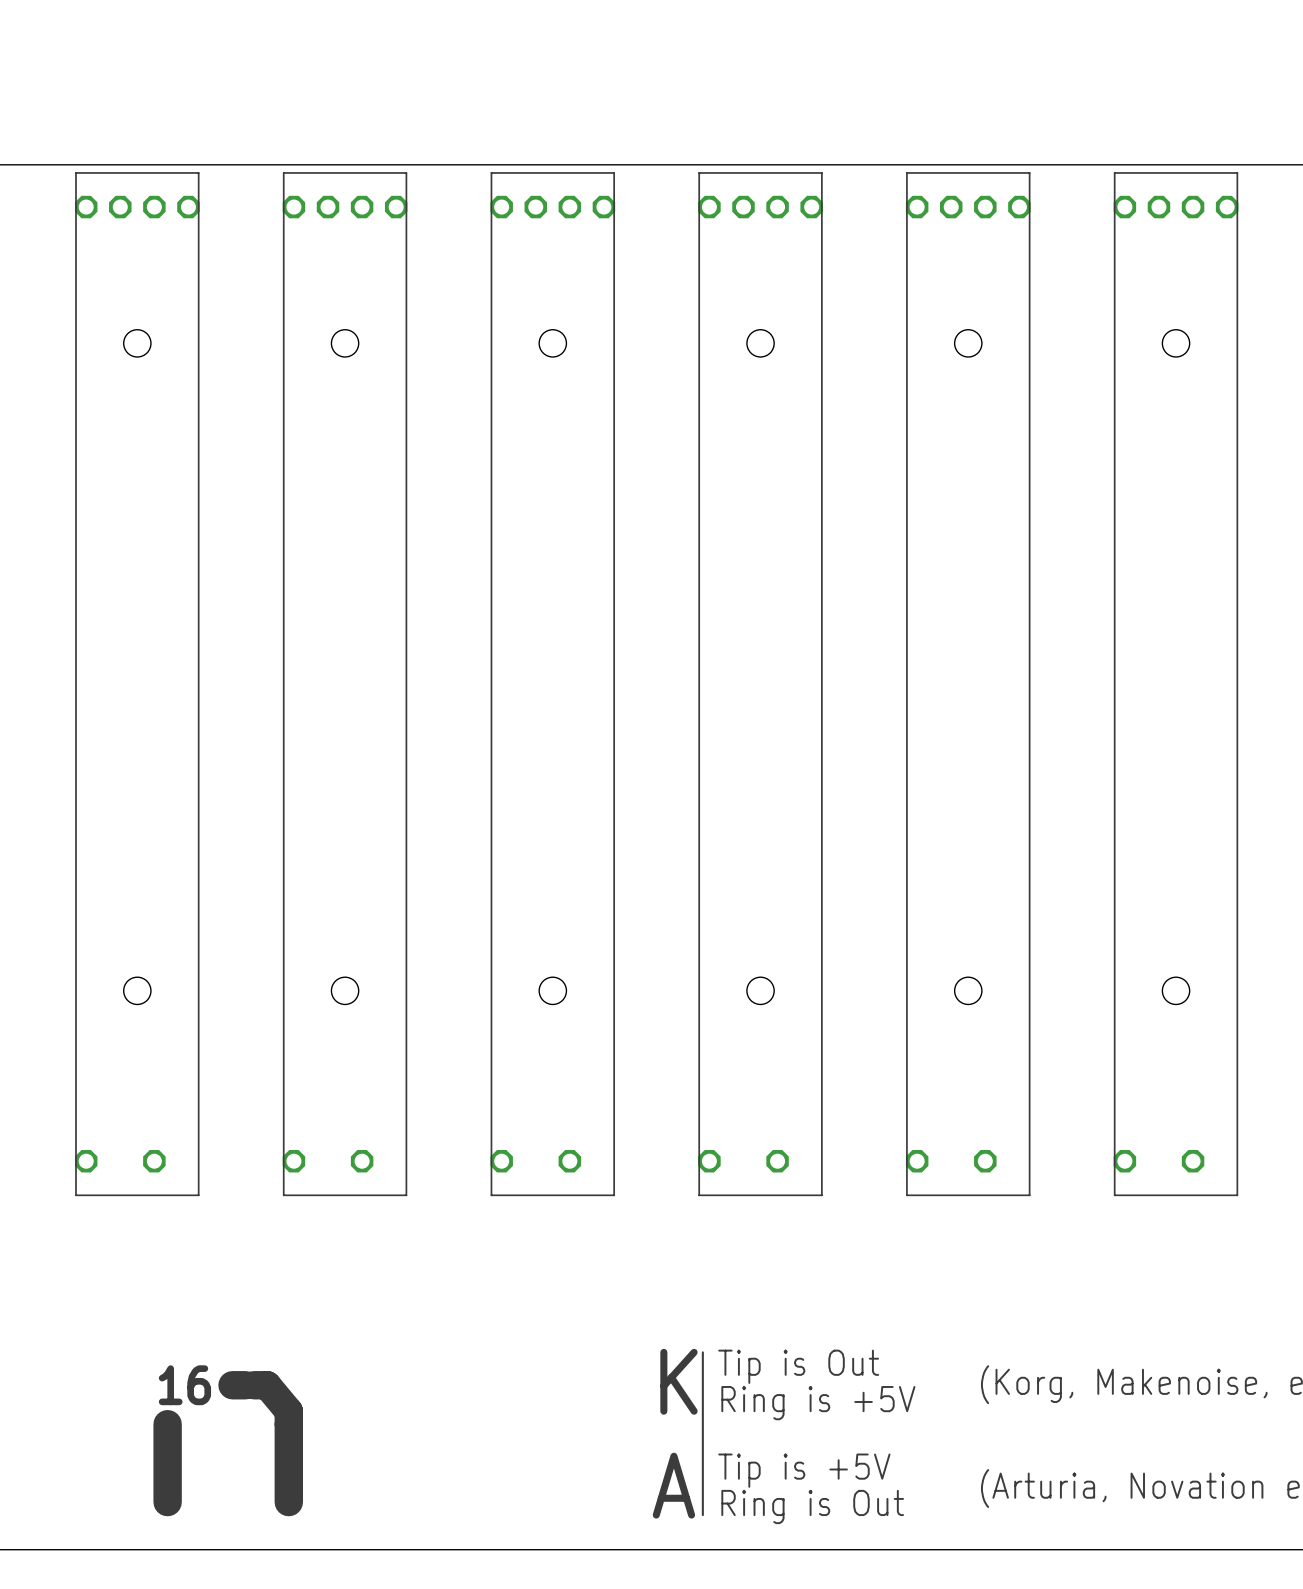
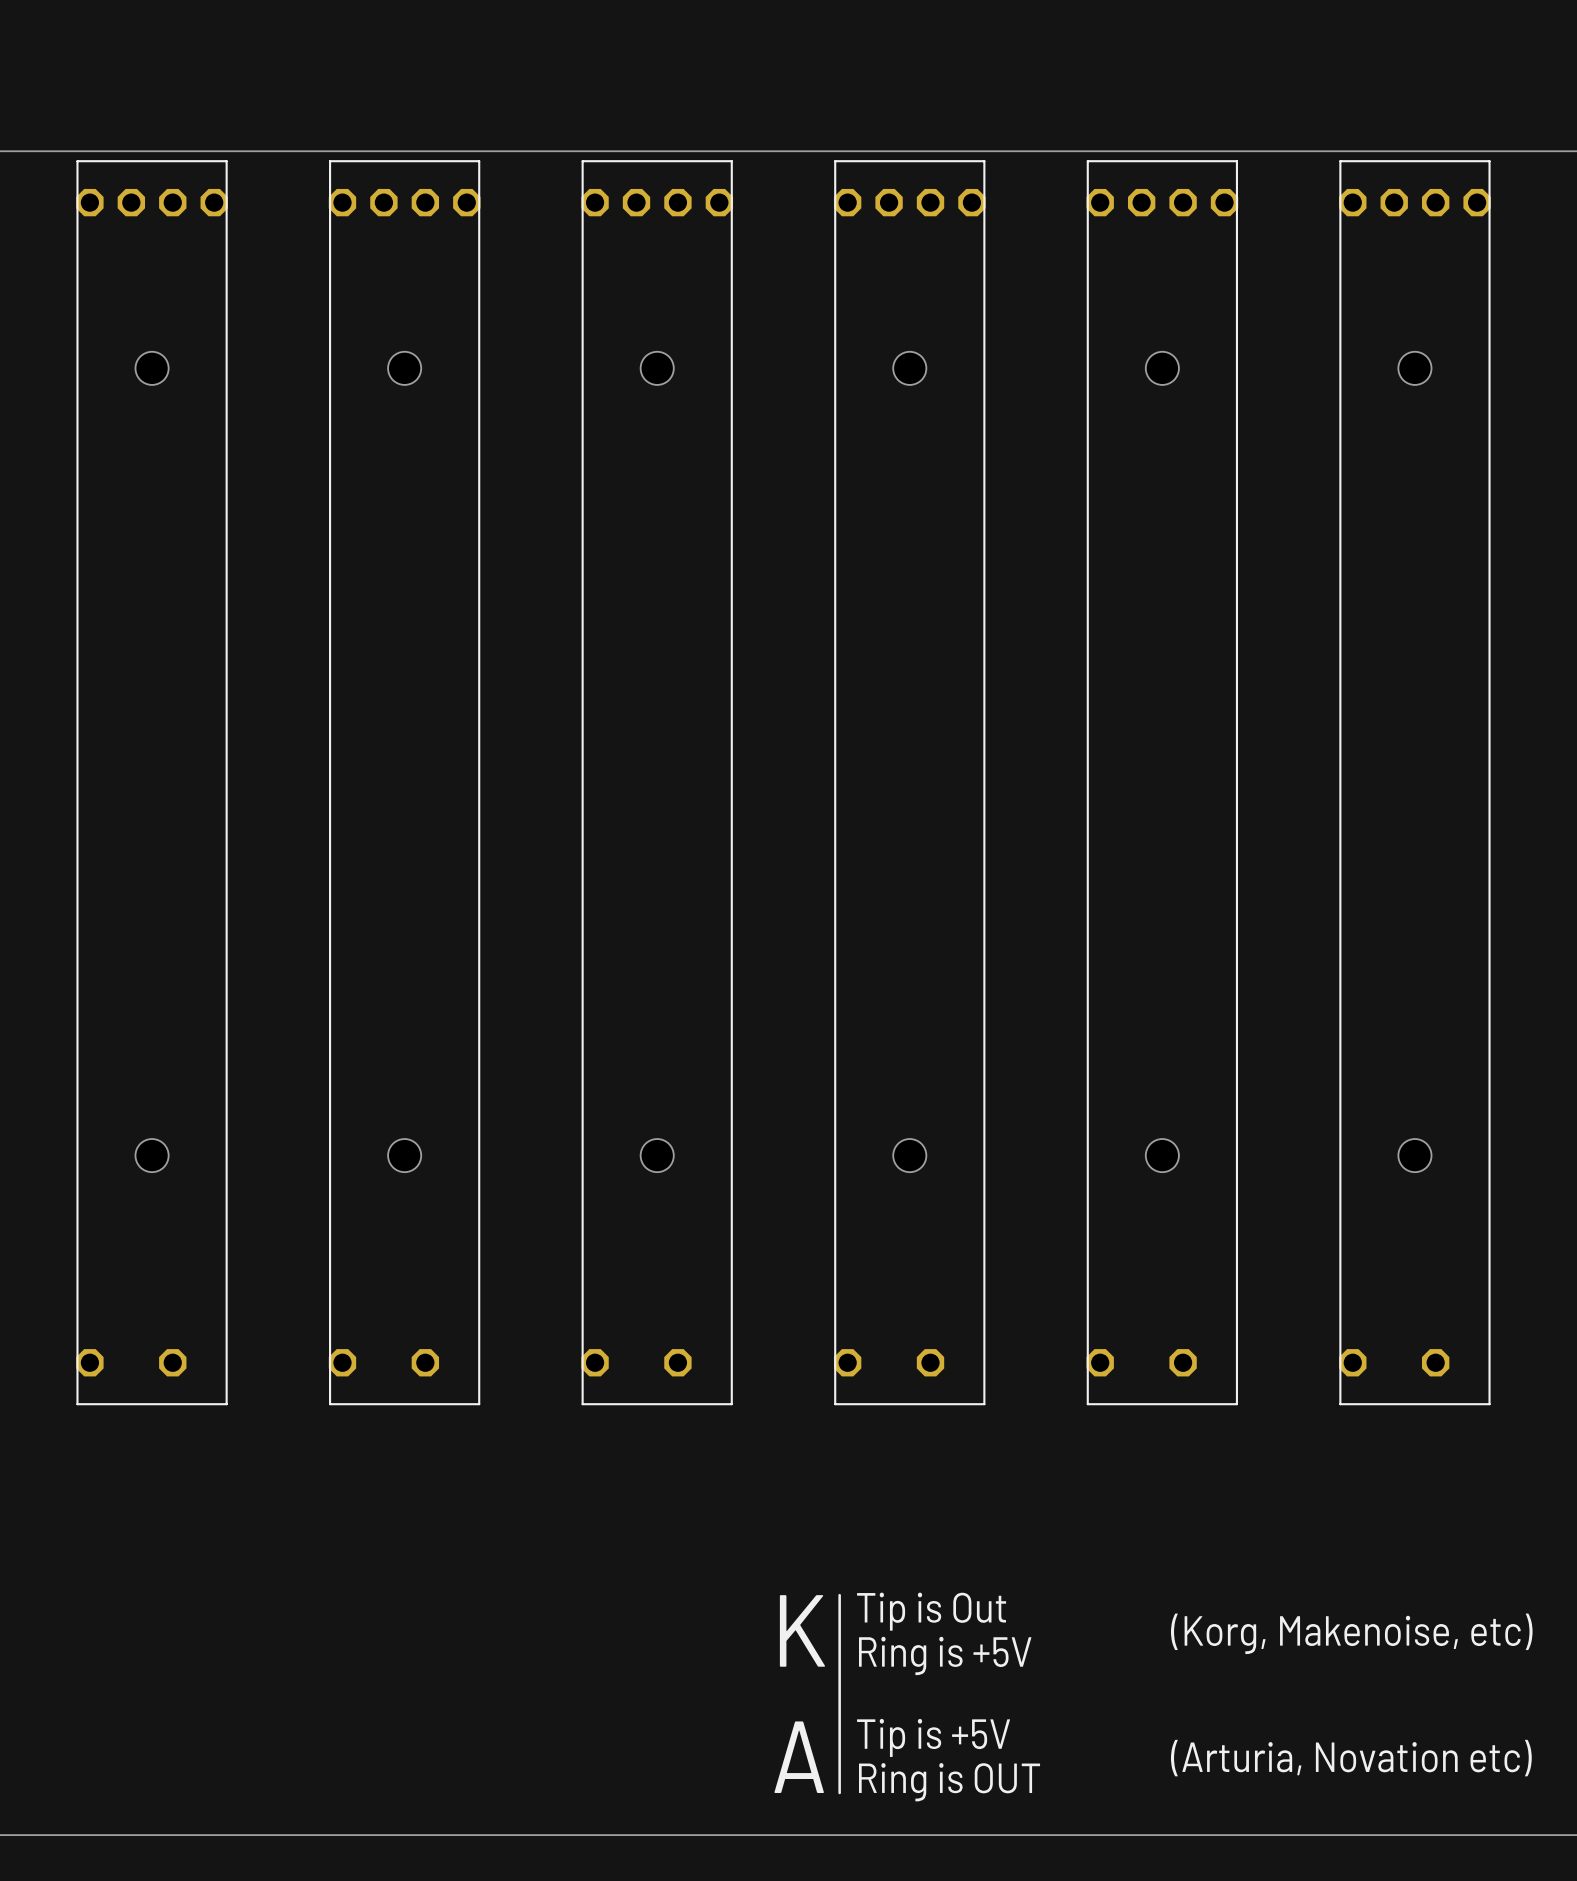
text: 16 (184, 1385) -> none
line: (232, 1385) (245, 1385) -> none
line: (254, 1385) (267, 1385) (288, 1411) (288, 1502) -> none
line: (167, 1424) (167, 1502) -> none
text: Ring is Out (812, 1507) -> Ring is OUT (949, 1782)

